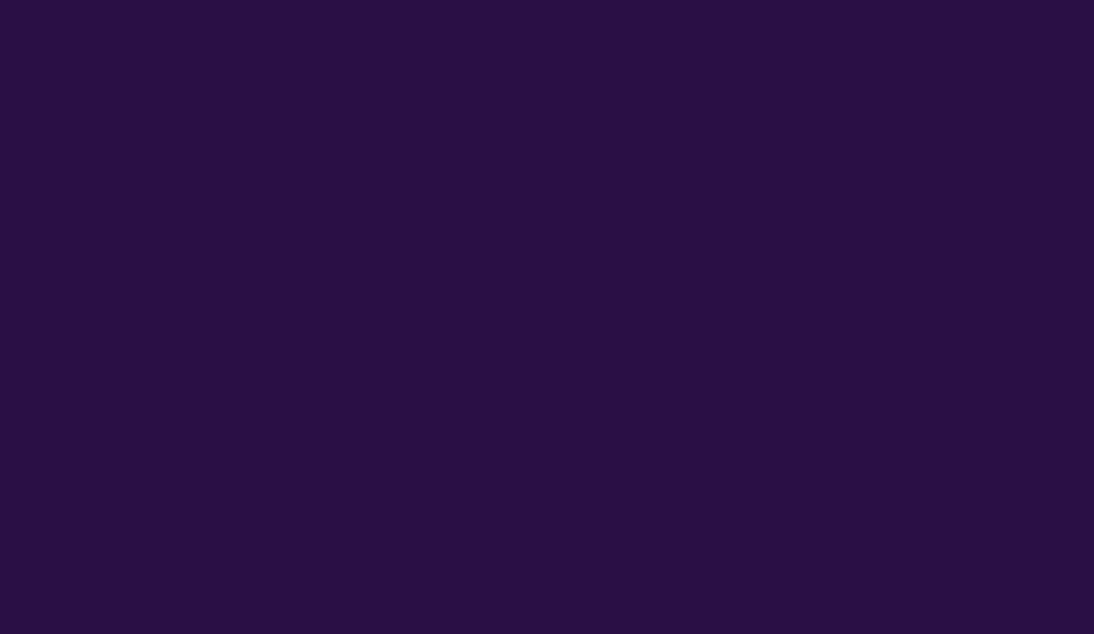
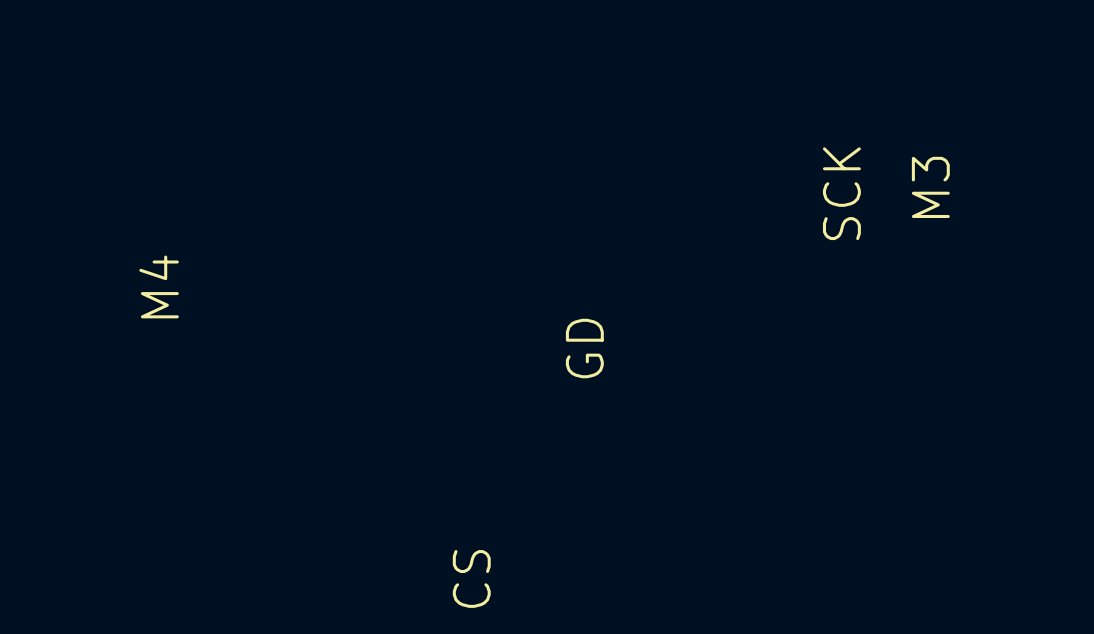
text: none -> M3 (930, 187)
text: none -> SCK (841, 193)
text: none -> M4 (159, 286)
text: none -> GD (584, 348)
text: none -> CS (471, 578)

